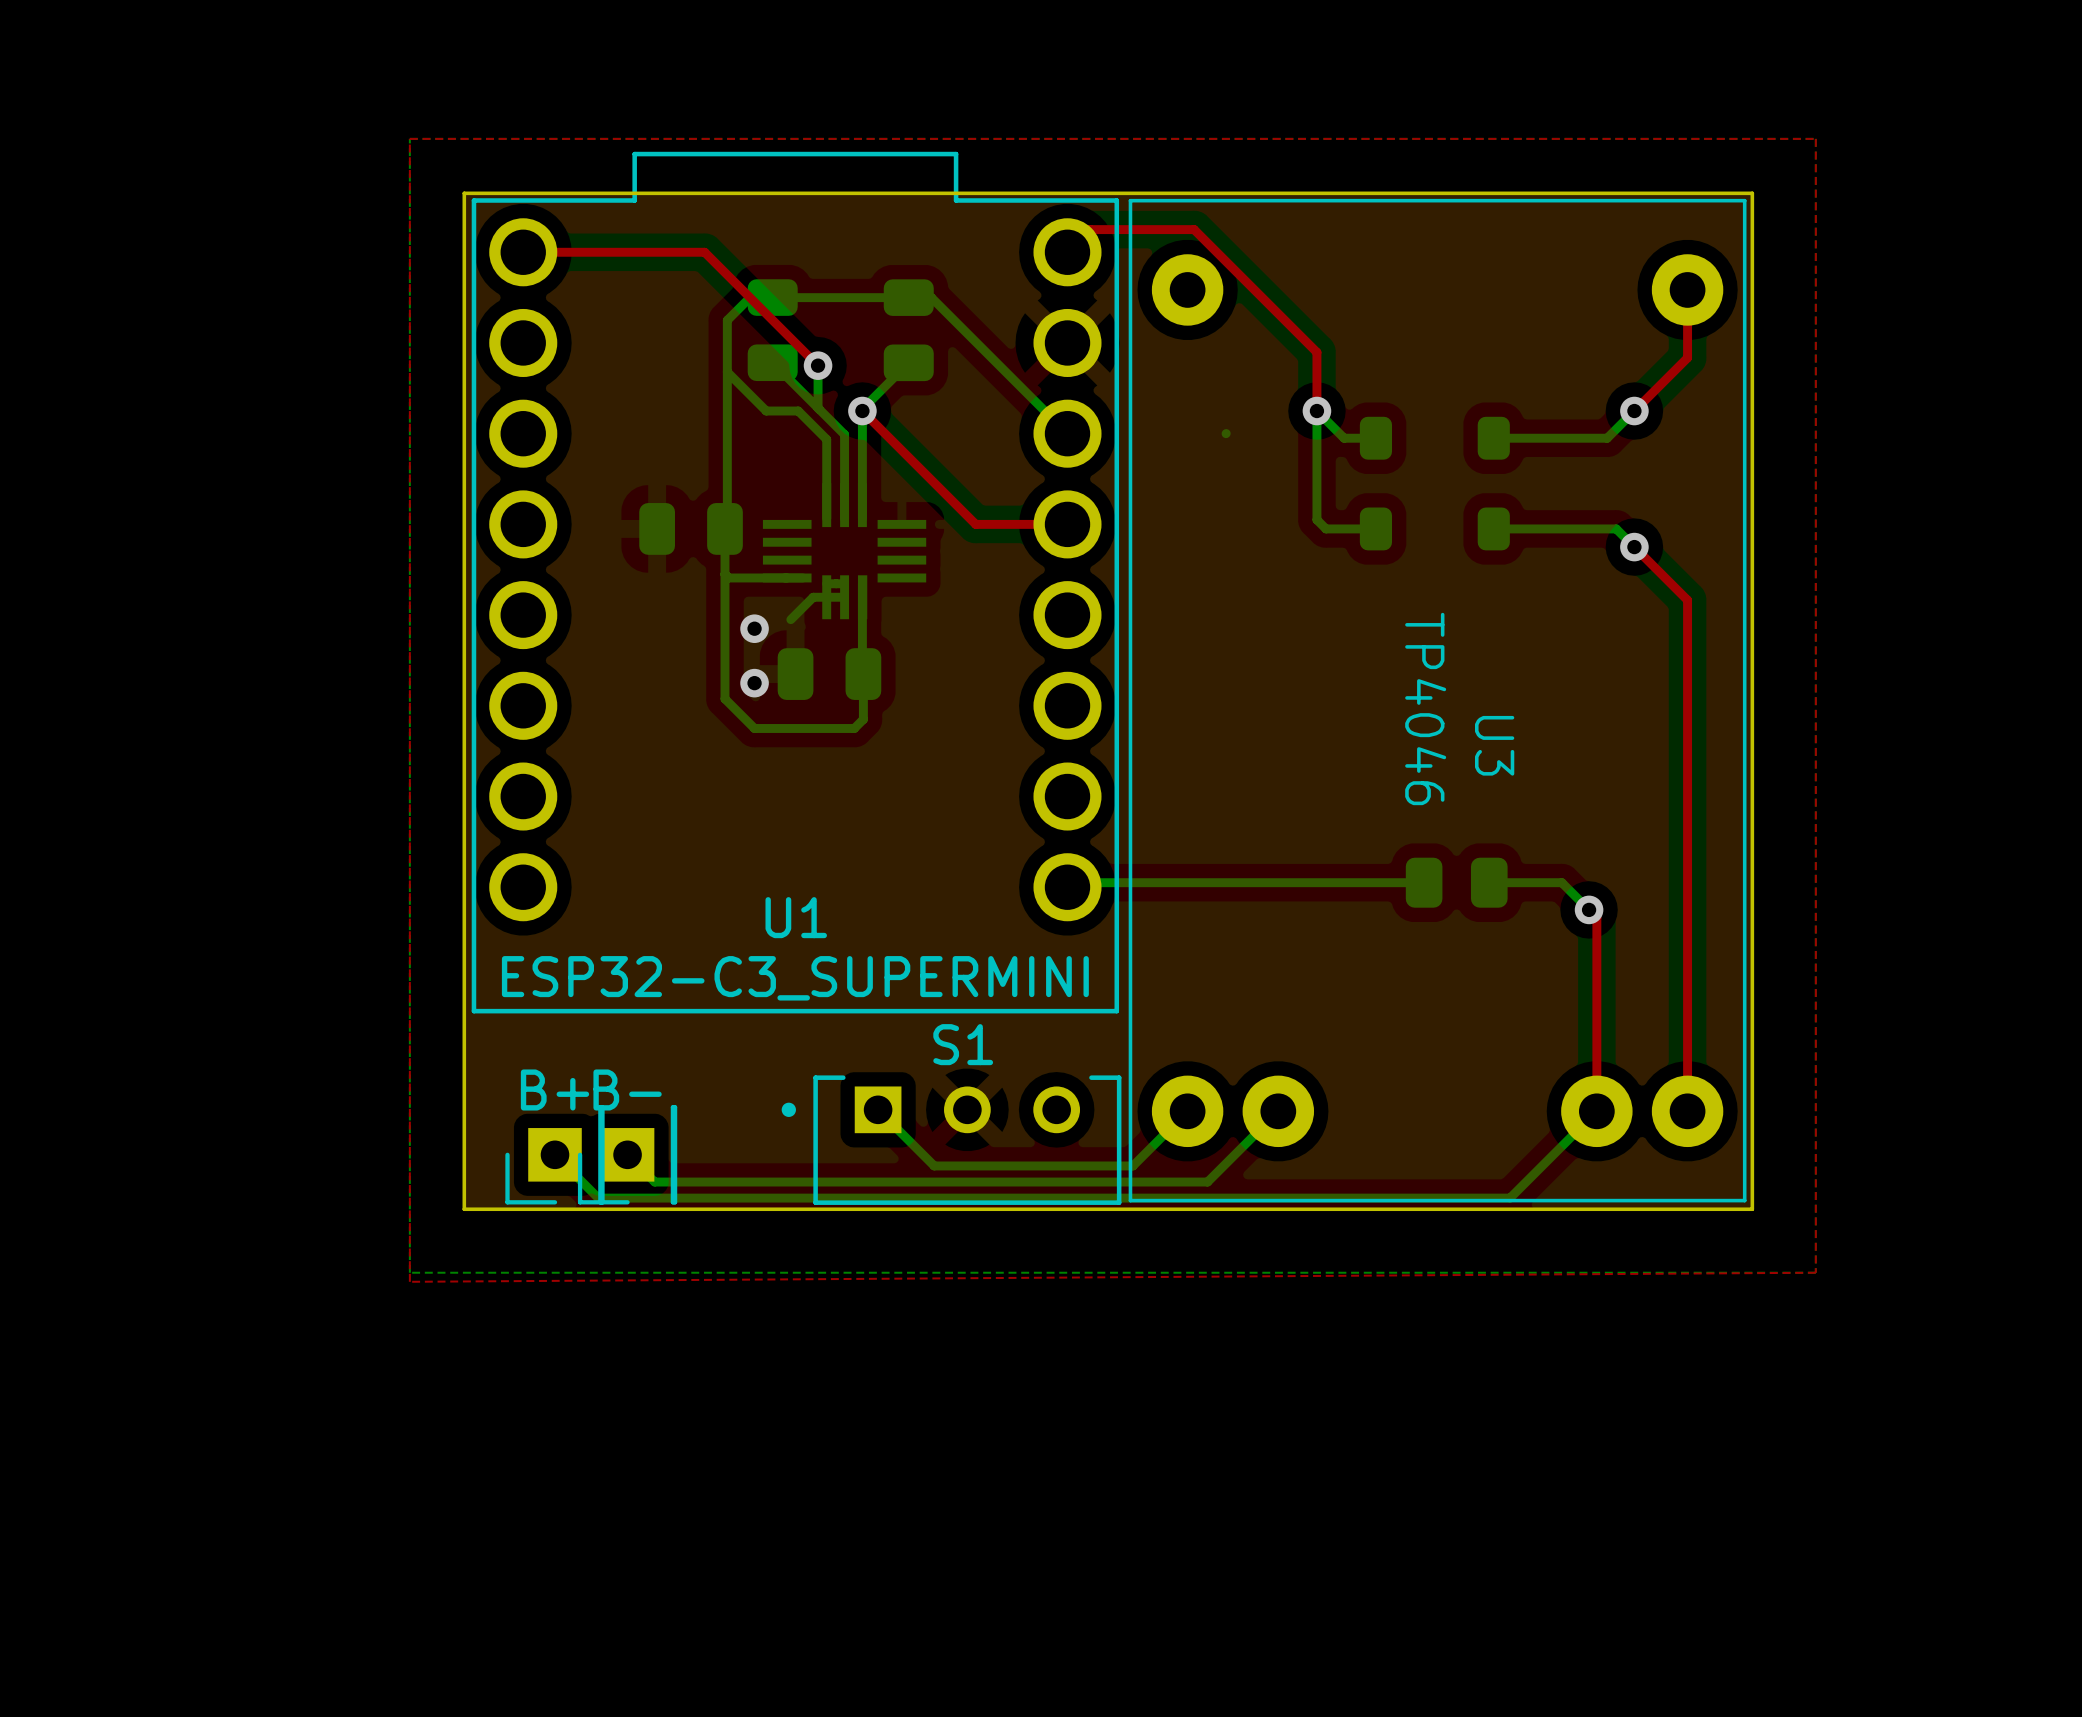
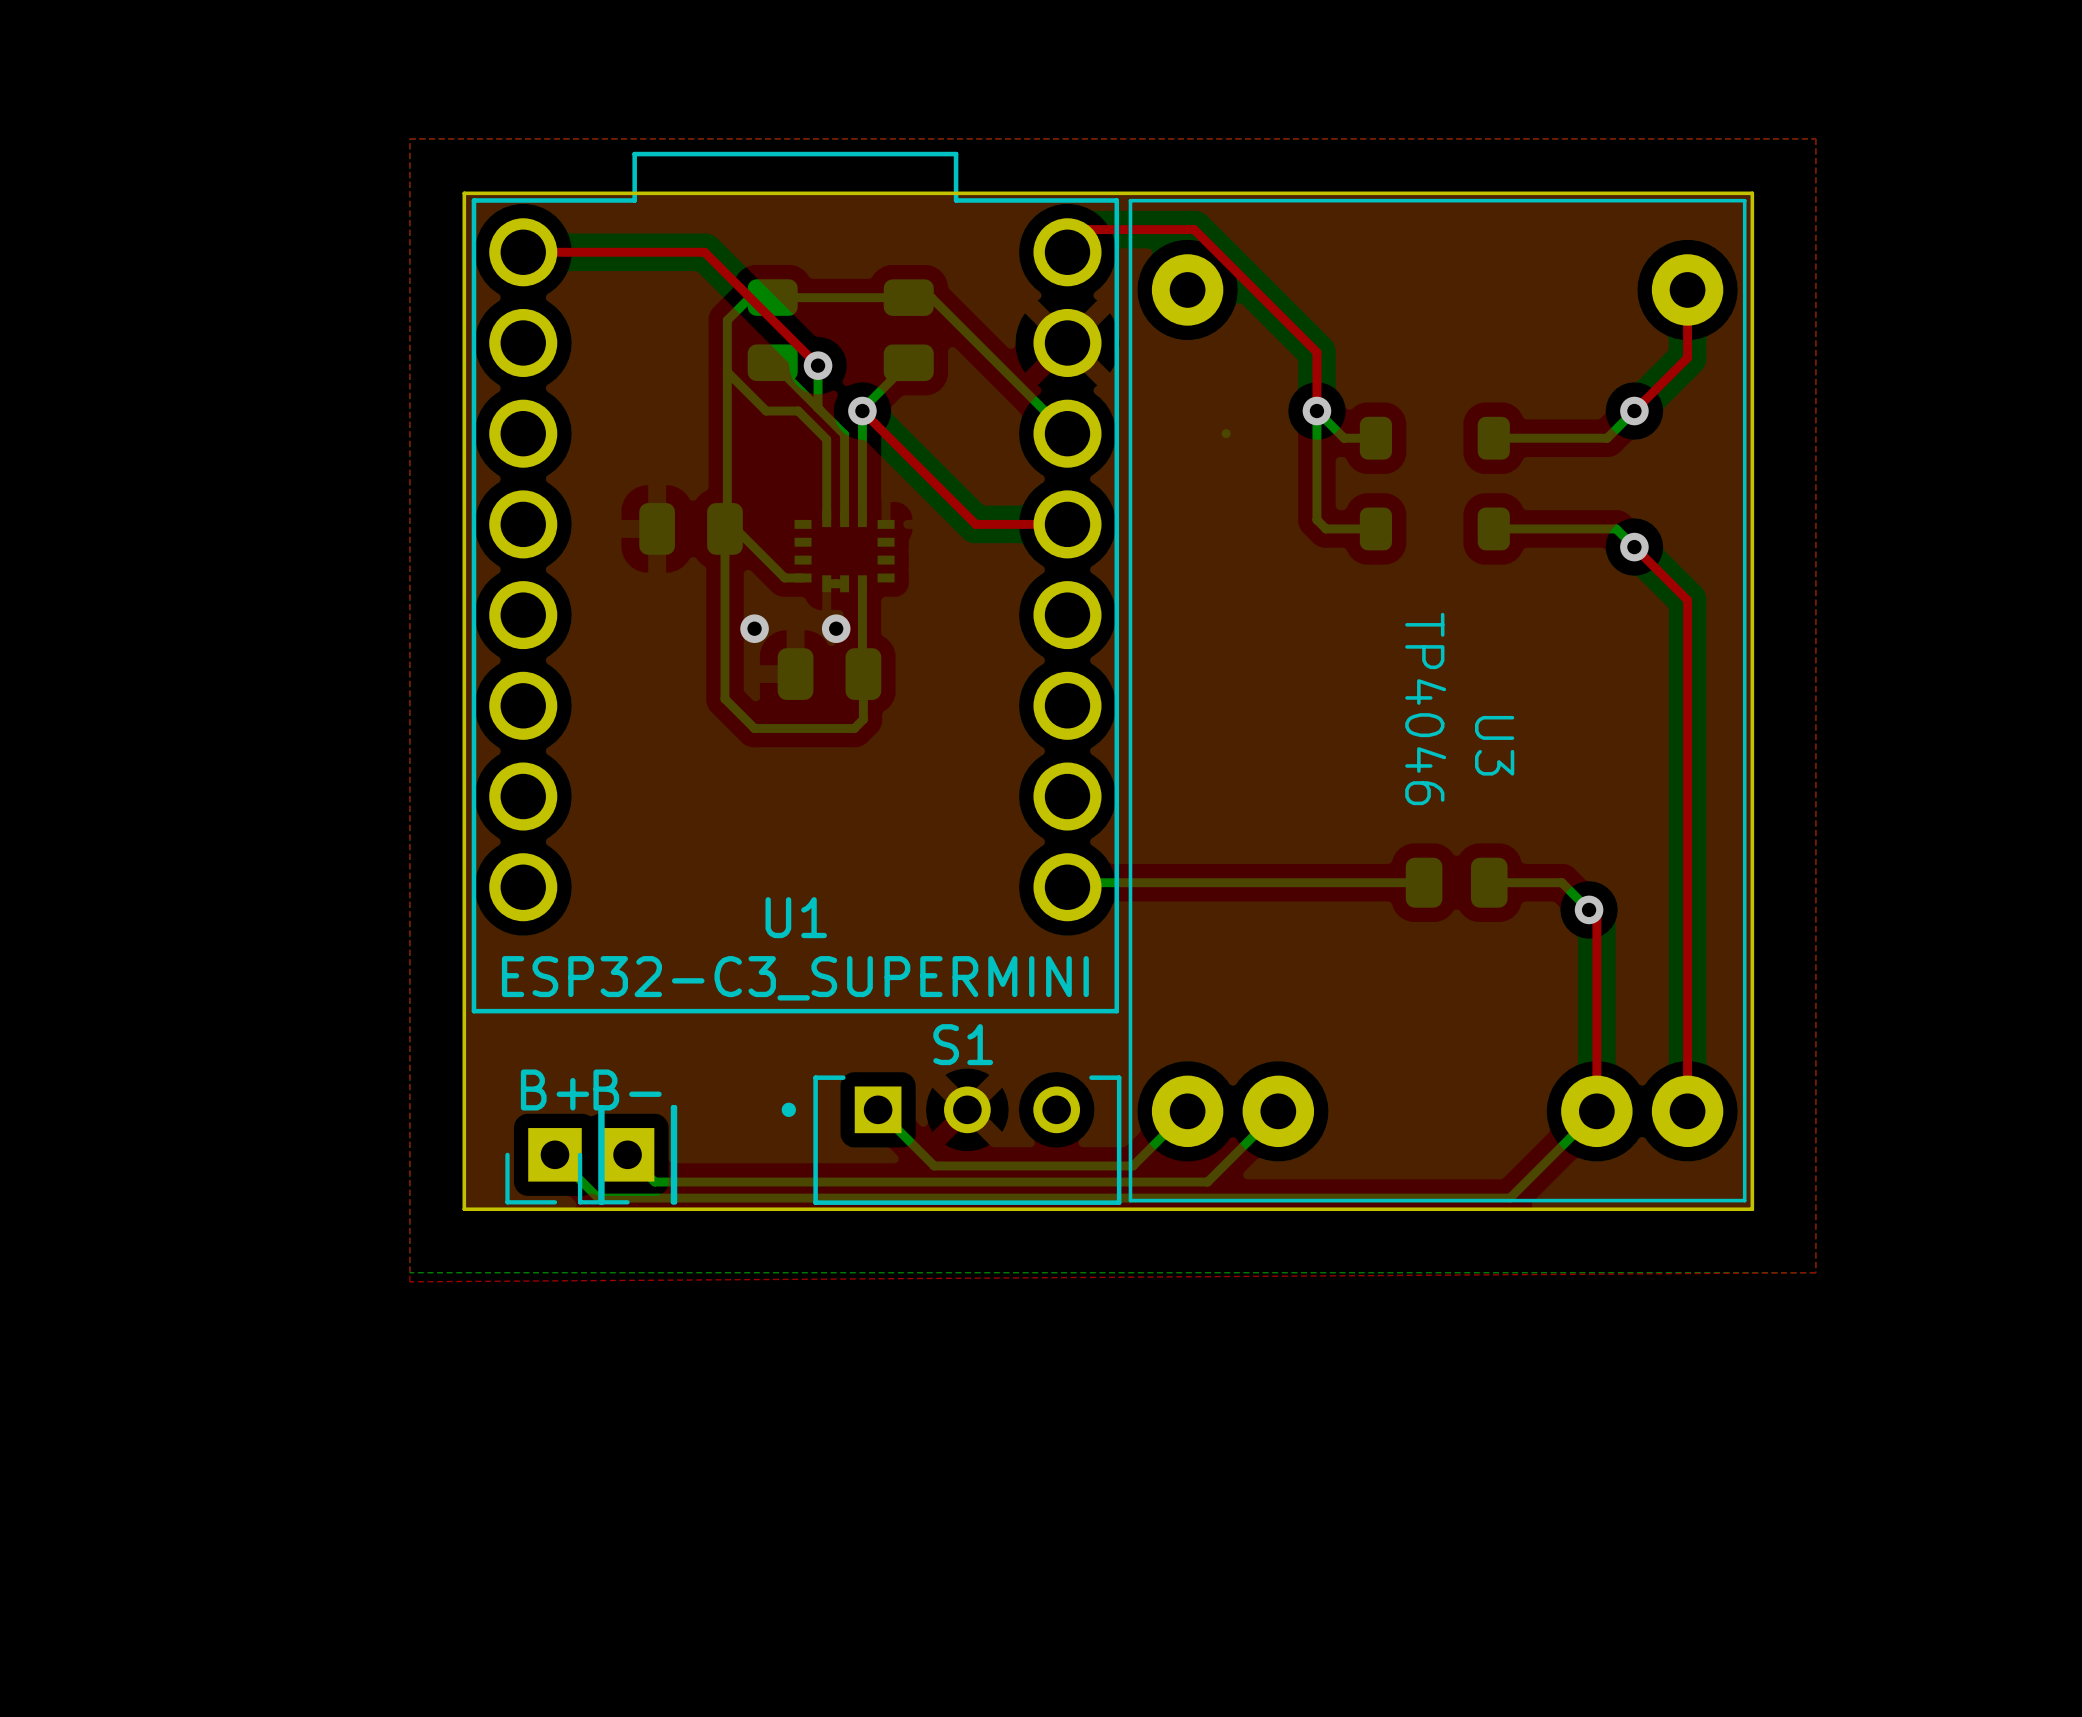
part footprint: [762, 483, 927, 620] -> [794, 510, 895, 593]
bottom track: (724, 574) (728, 577) (784, 577) -> (727, 520) (784, 577)
bottom track: (844, 597) (813, 597) (790, 619) -> none
via position: (754, 683) -> (836, 628)

